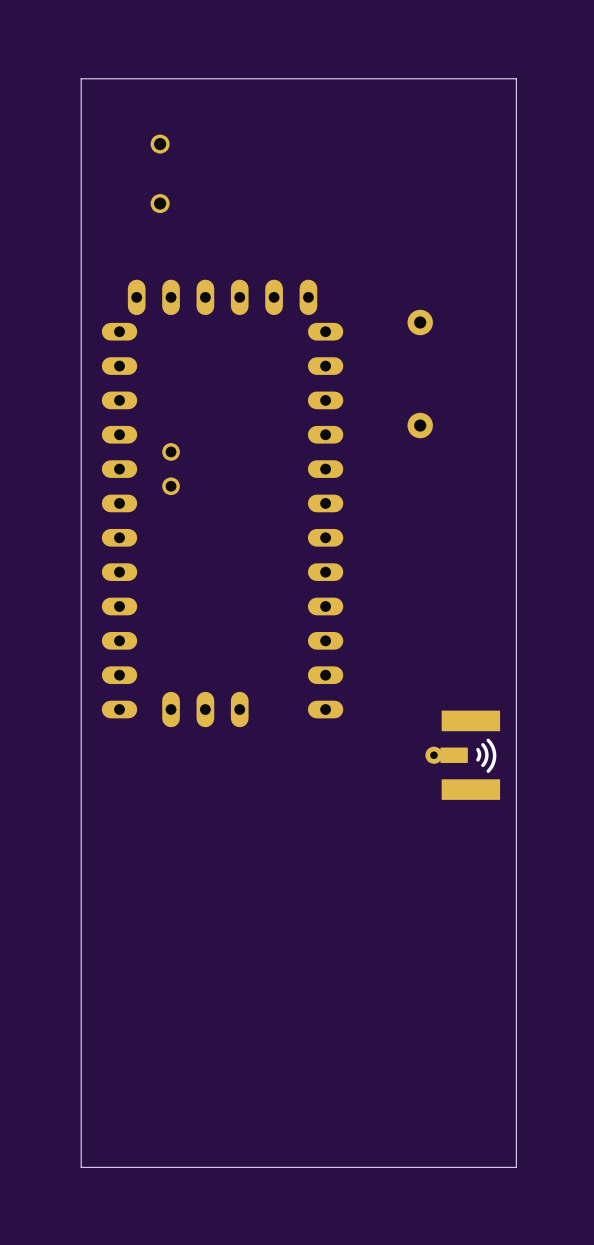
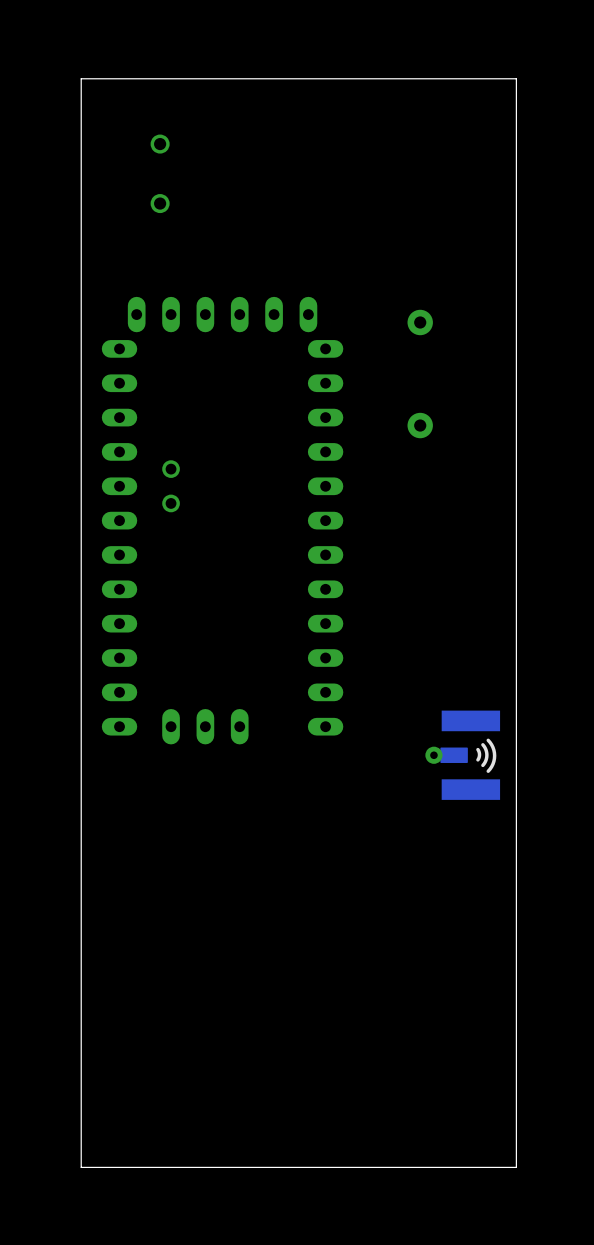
part position: (222, 503) -> (222, 520)

